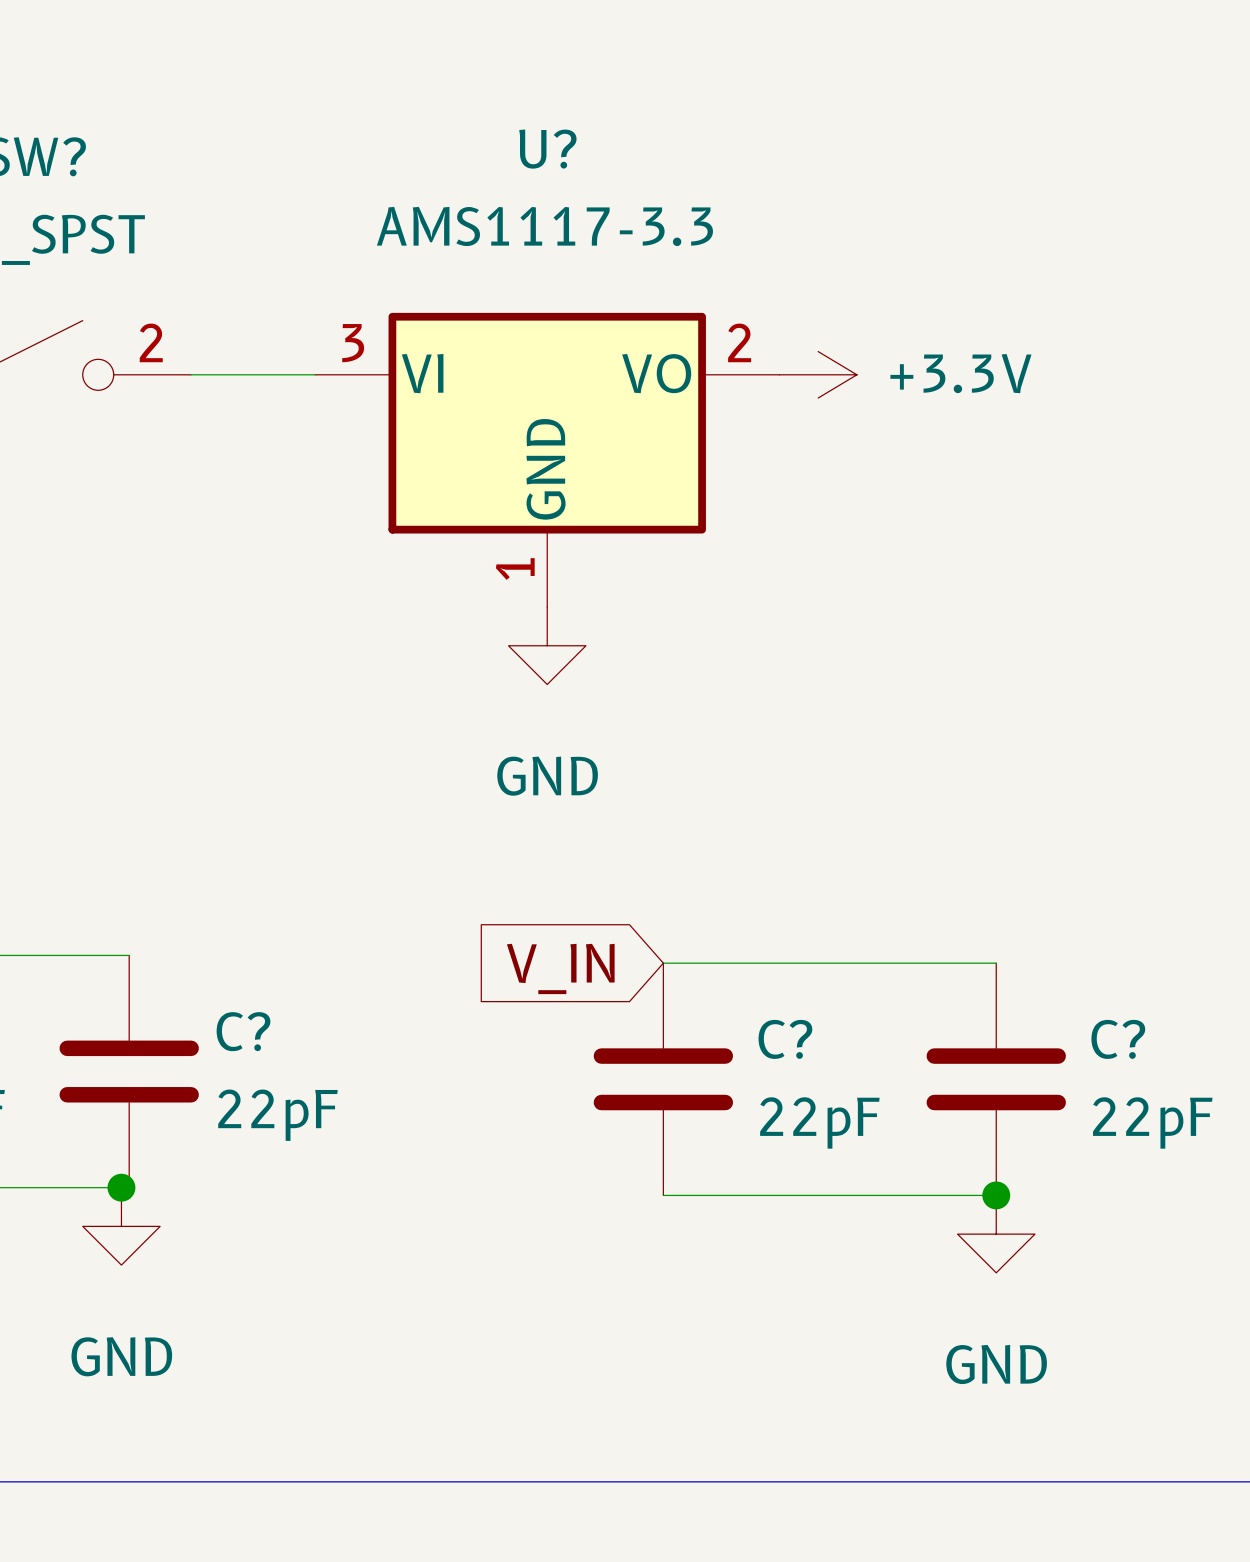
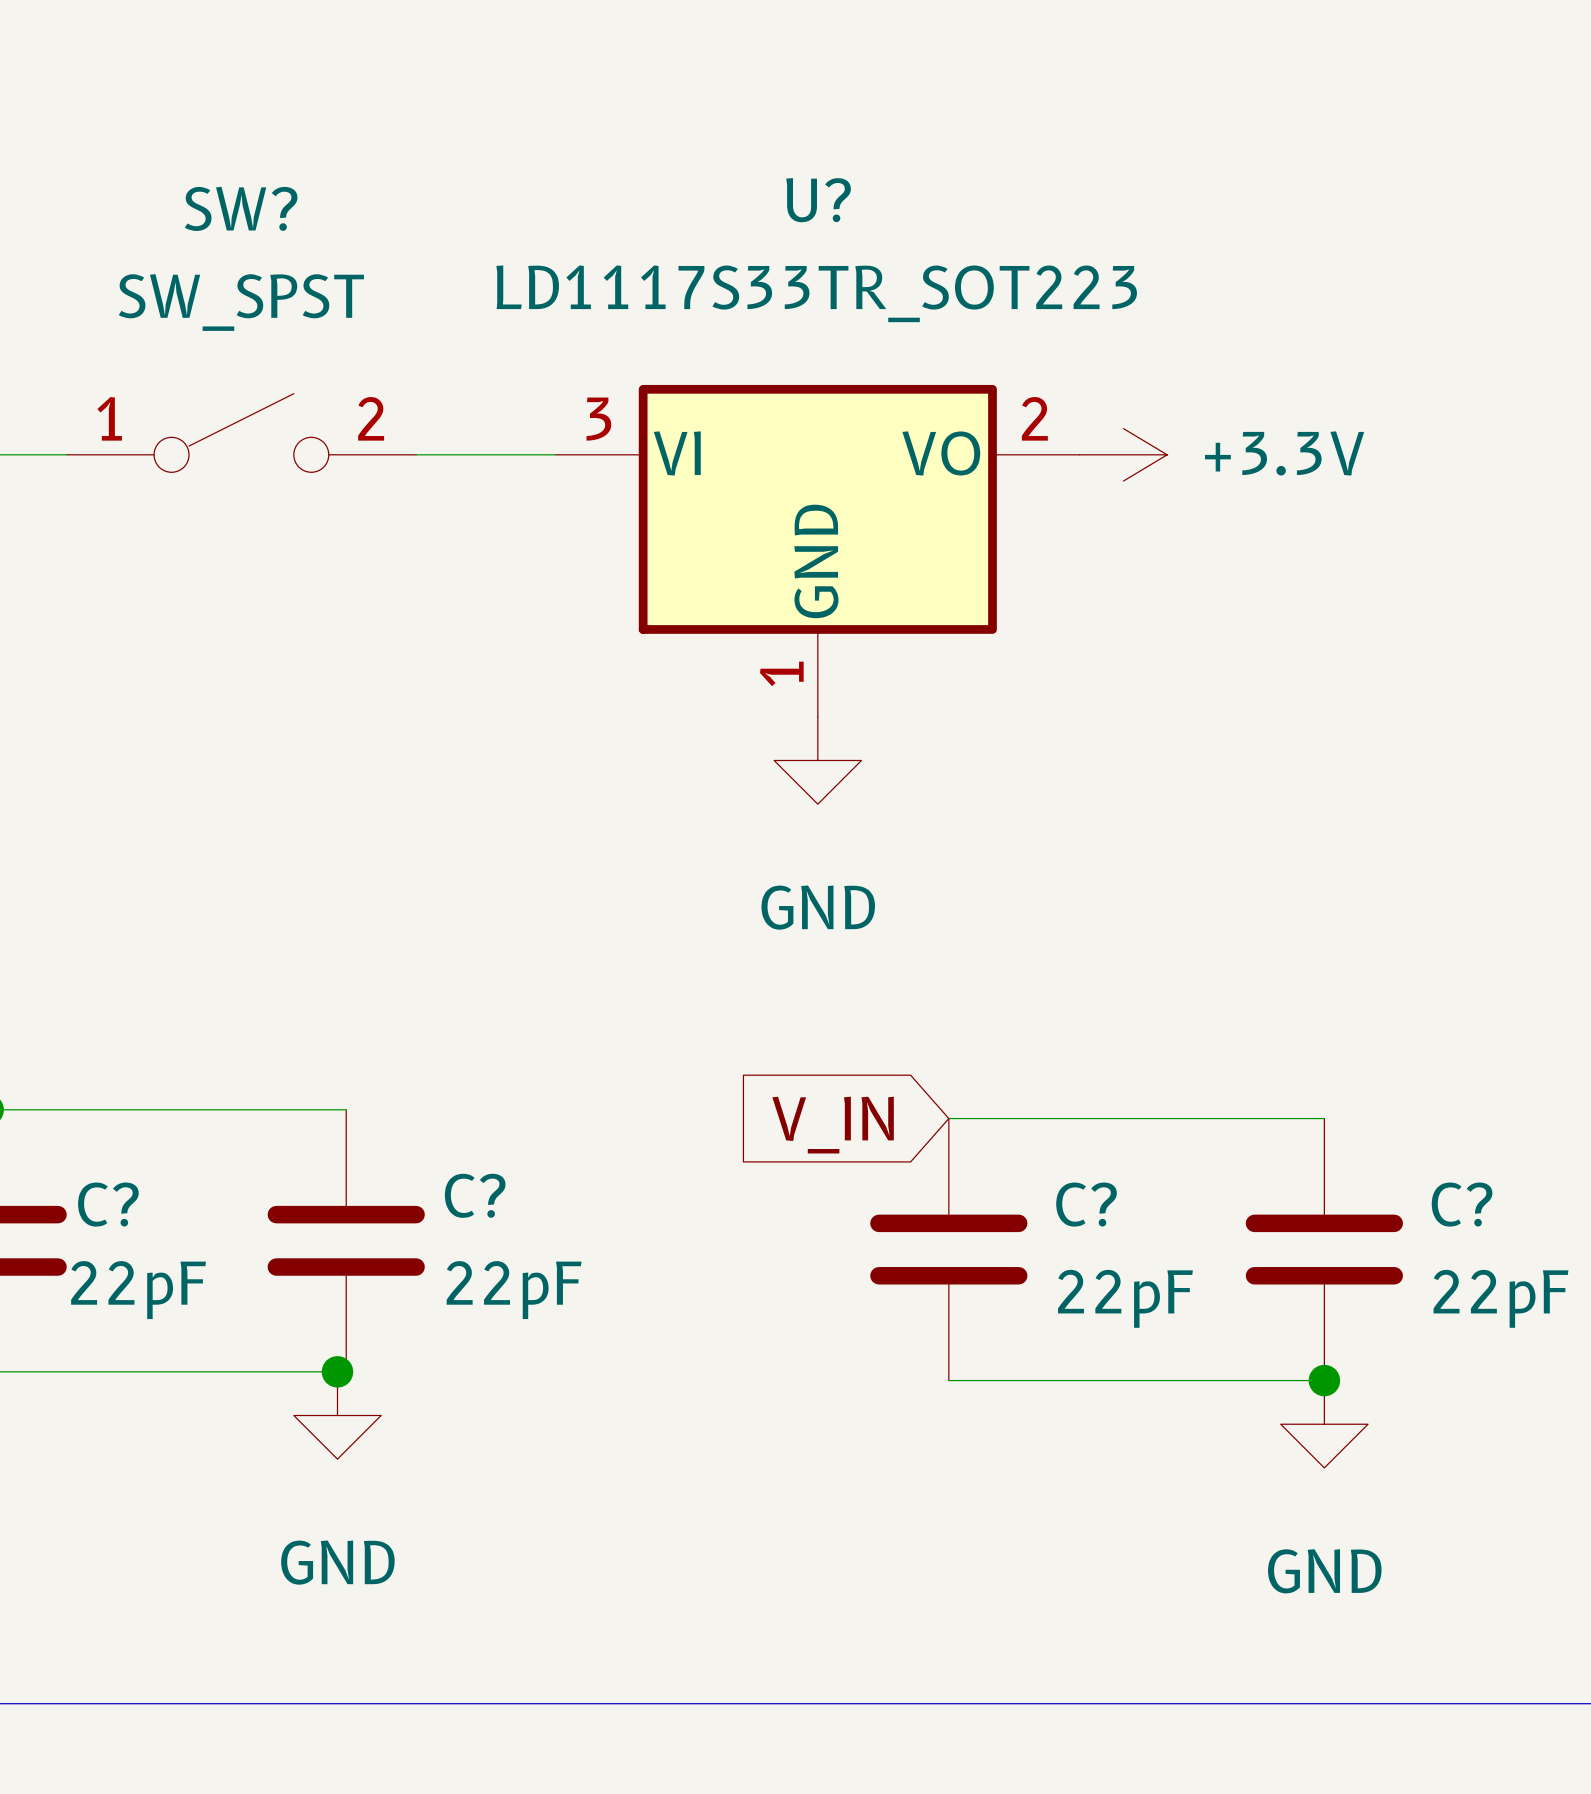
U? value: AMS1117-3.3 (544, 226) -> LD1117S33TR_SOT223 (816, 293)

